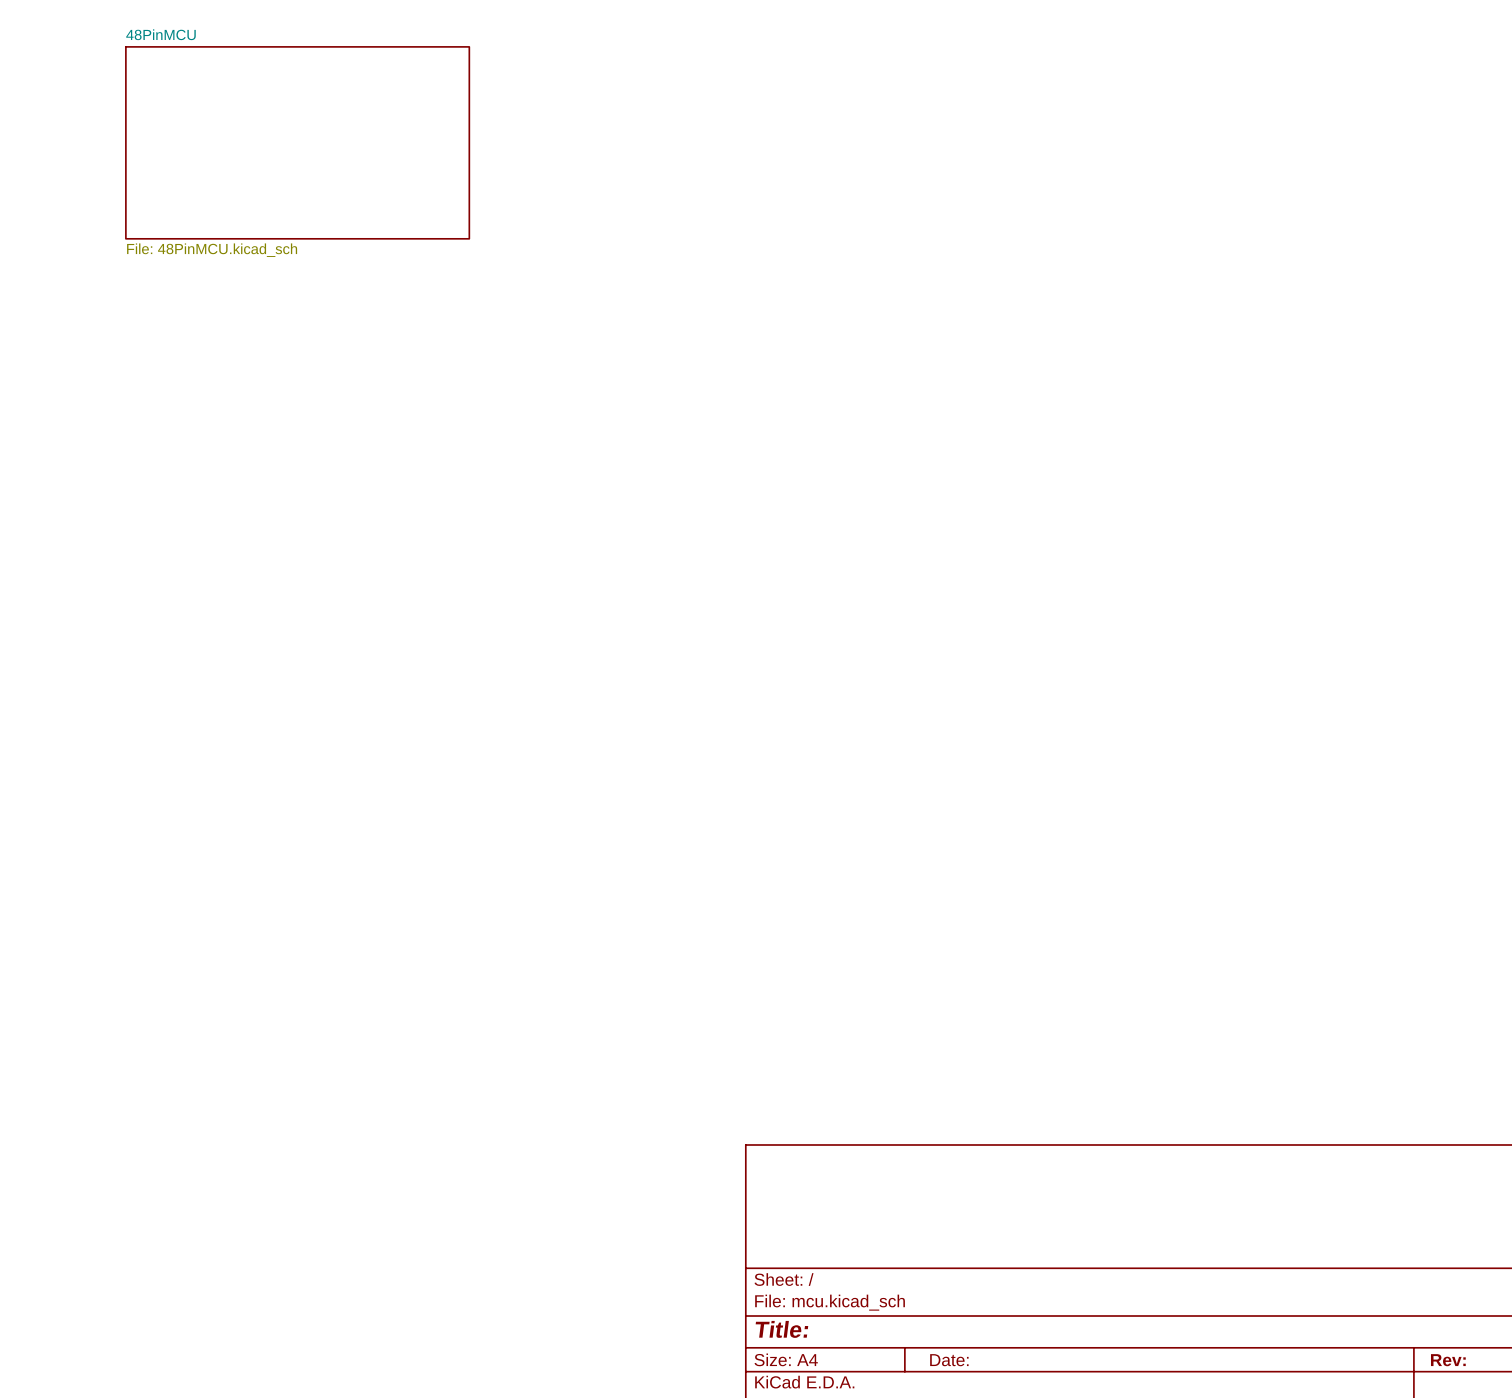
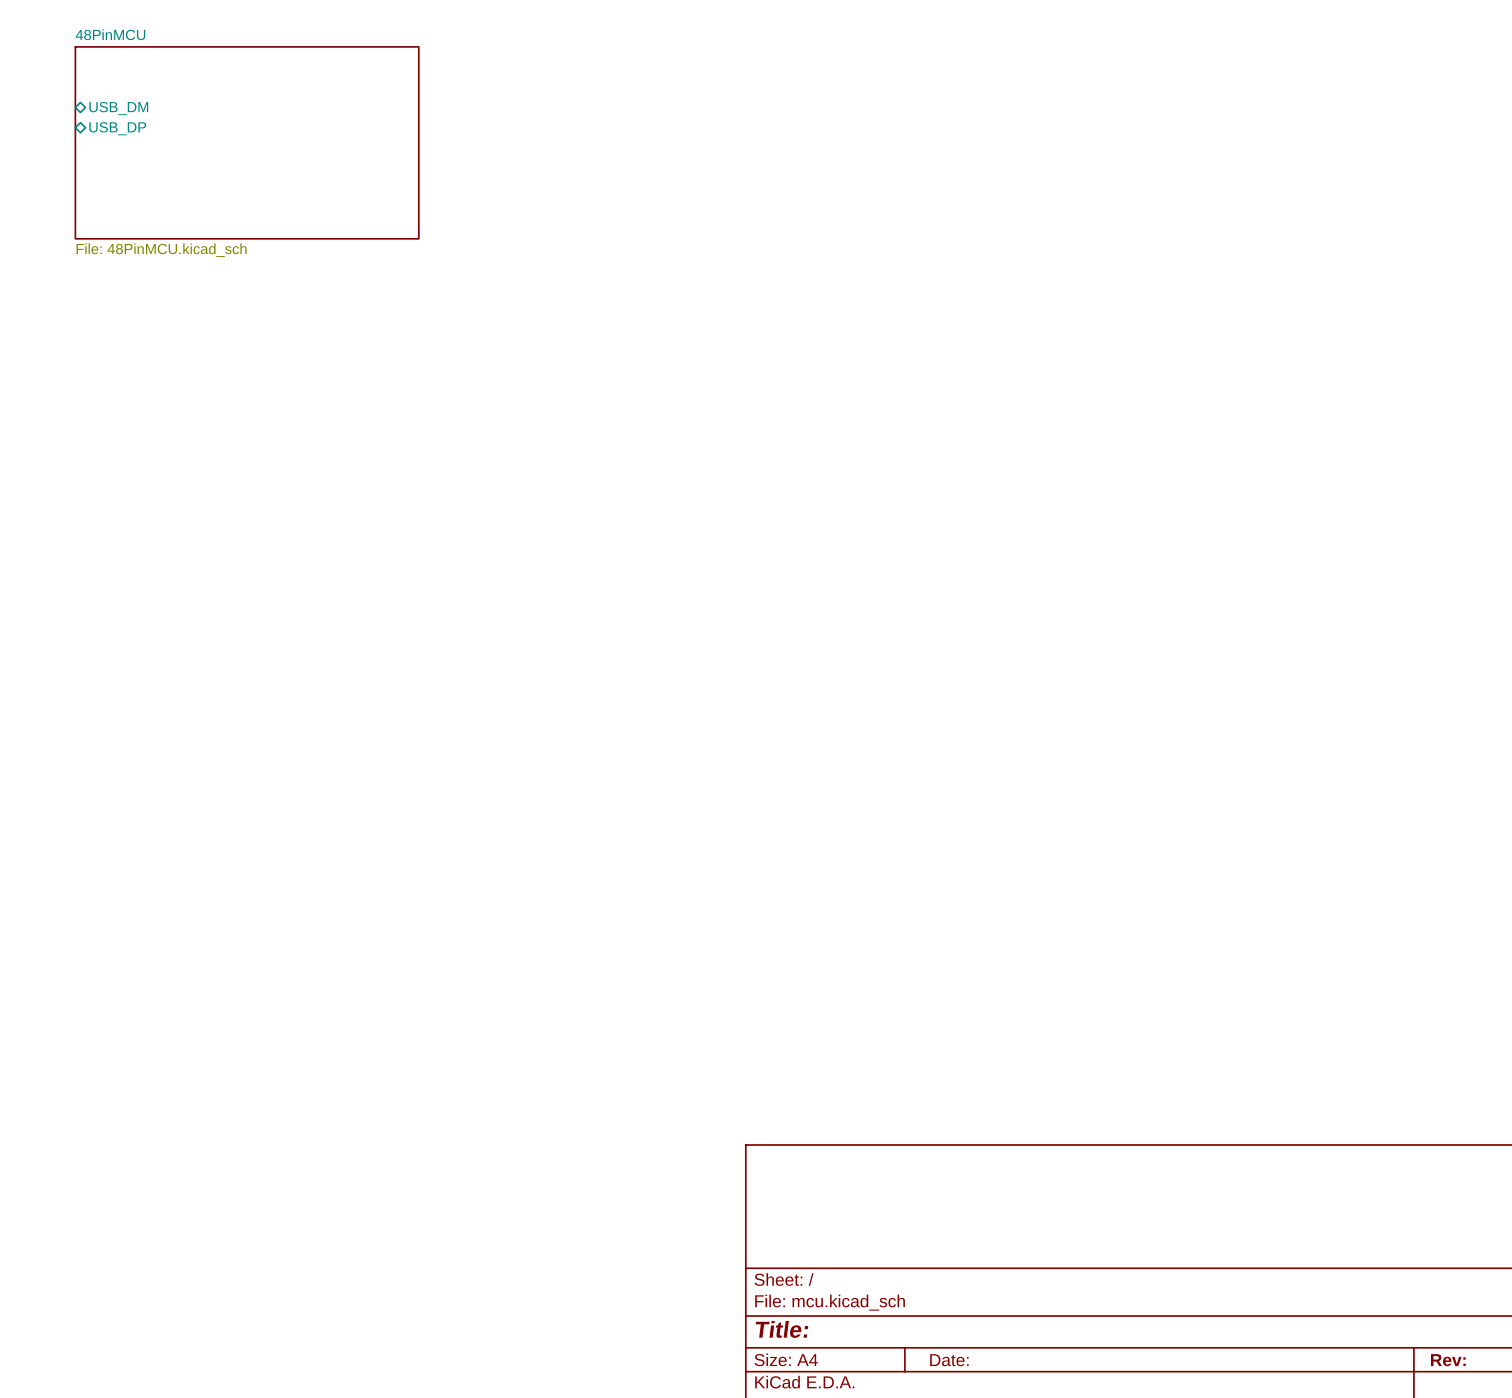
sheet pin: none -> USB_DM (118, 108)
sheet pin: none -> USB_DP (117, 128)
sheet 48PinMCU position: (297, 142) -> (247, 142)

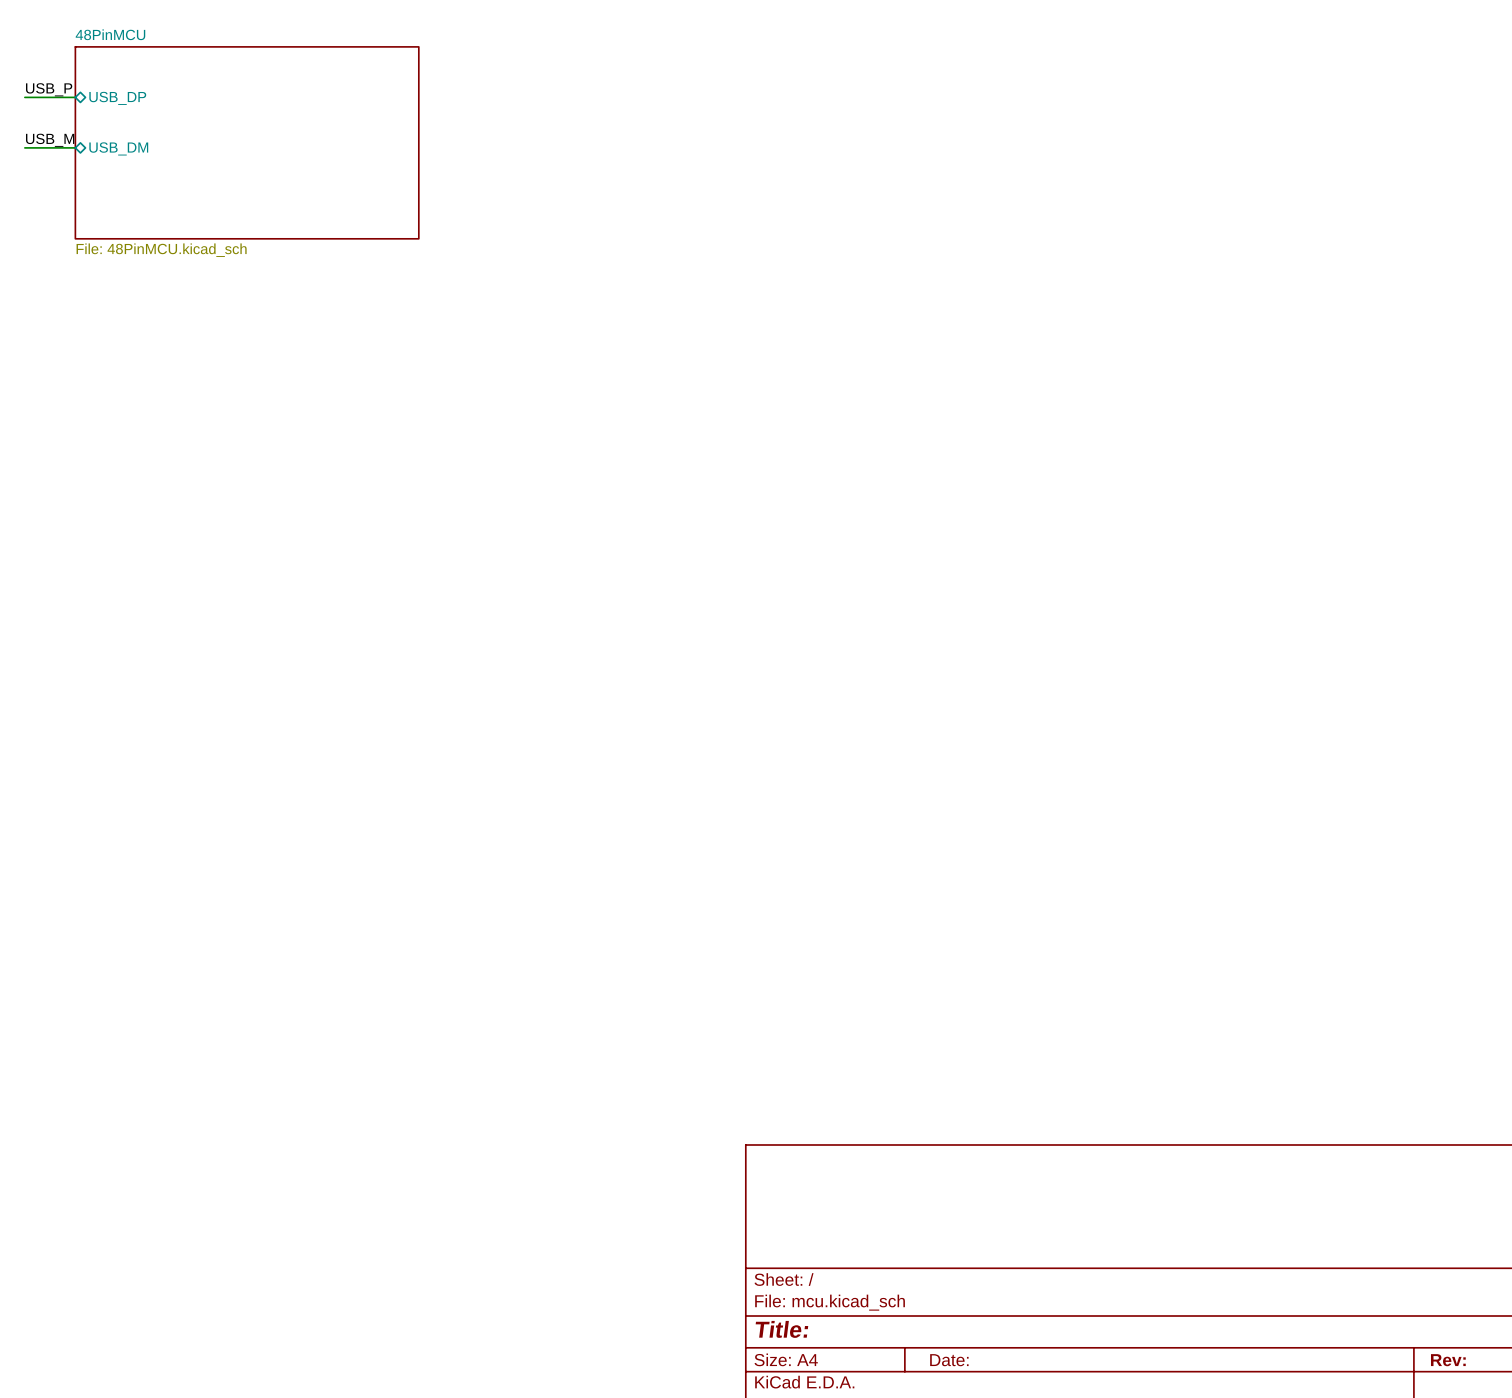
label: none -> USB_P (49, 89)
wire: none -> (24, 97) (75, 97)
sheet pin position: USB_DM (118, 108) -> USB_DM (118, 148)
sheet pin position: USB_DP (117, 128) -> USB_DP (117, 98)
label: none -> USB_M (50, 140)
wire: none -> (24, 147) (75, 147)

